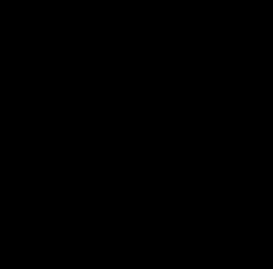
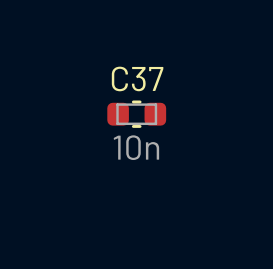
C37: none -> 10n (136, 114)

